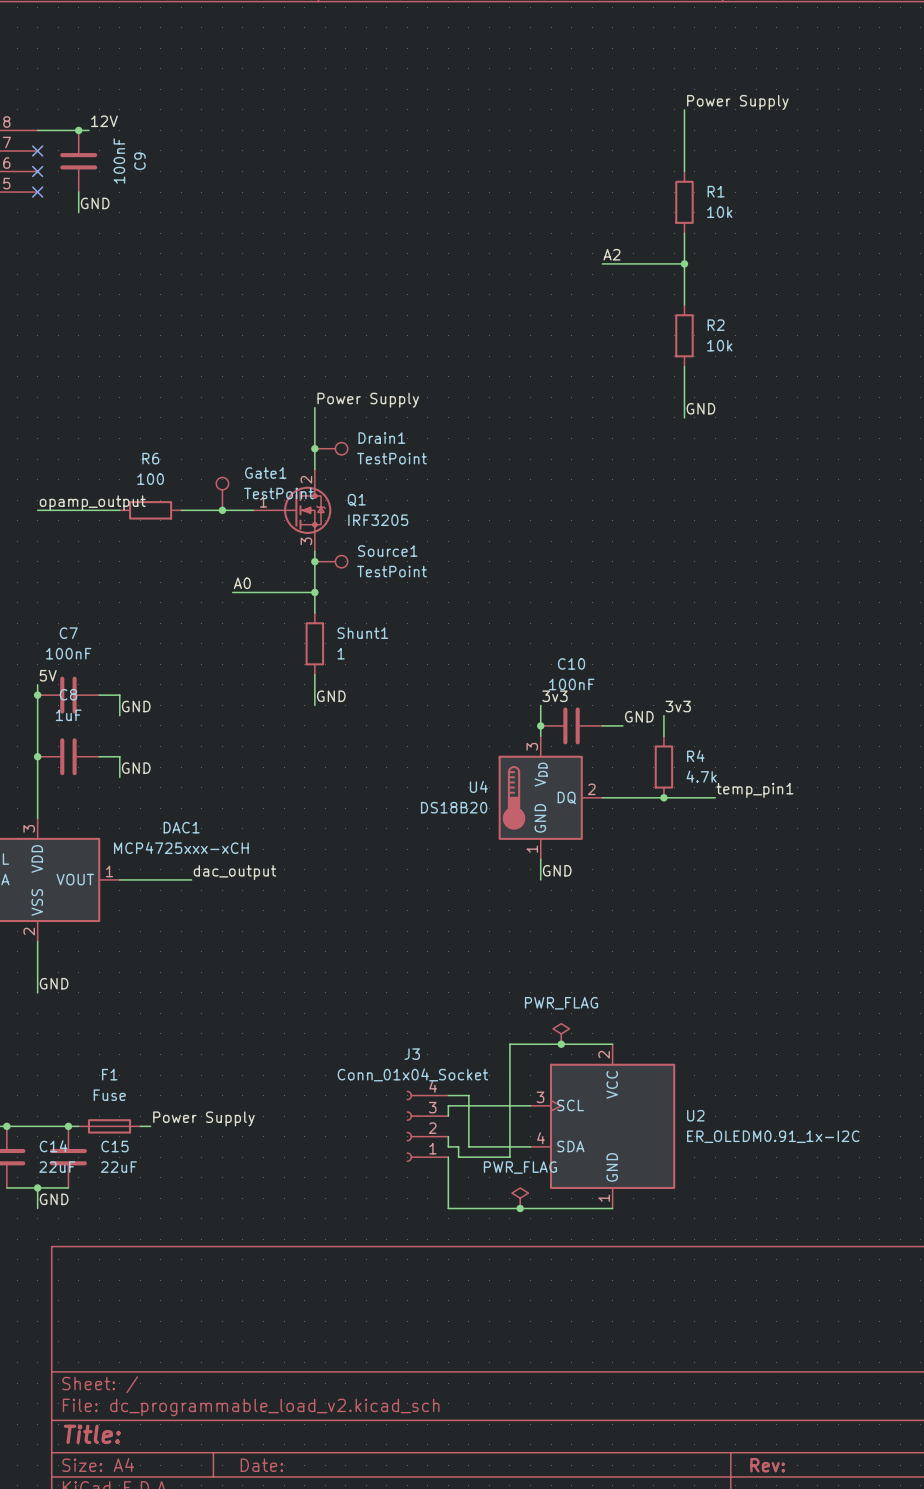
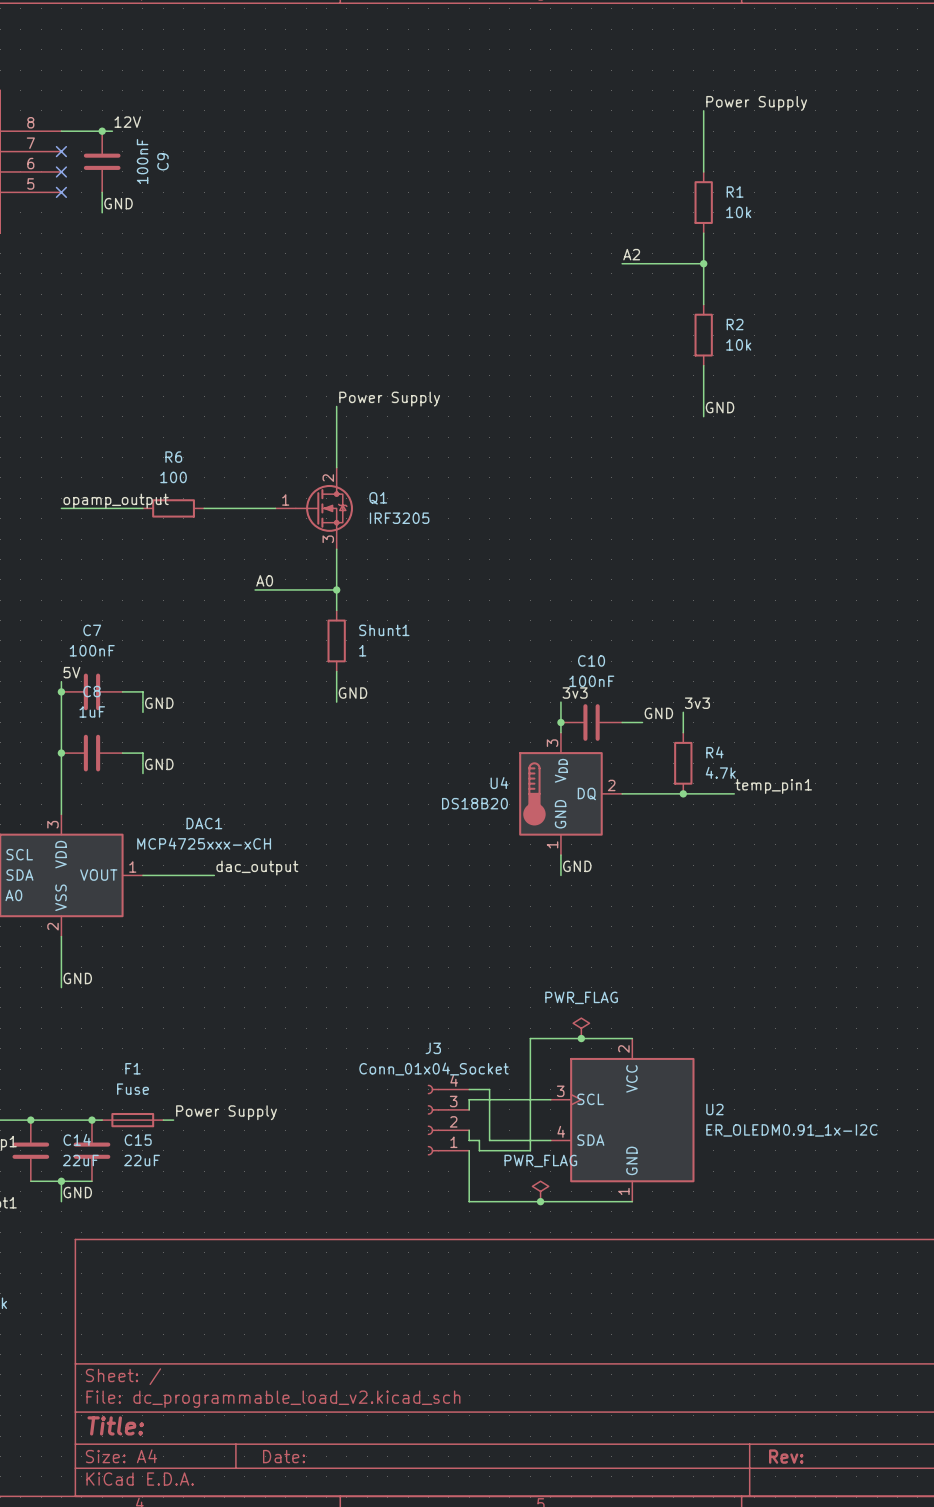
junction: (314, 448) -> none
Drain1: TestPoint (331, 448) -> none
Gate1: TestPoint (222, 493) -> none
junction: (222, 510) -> none
junction: (314, 561) -> none
Source1: TestPoint (331, 561) -> none

